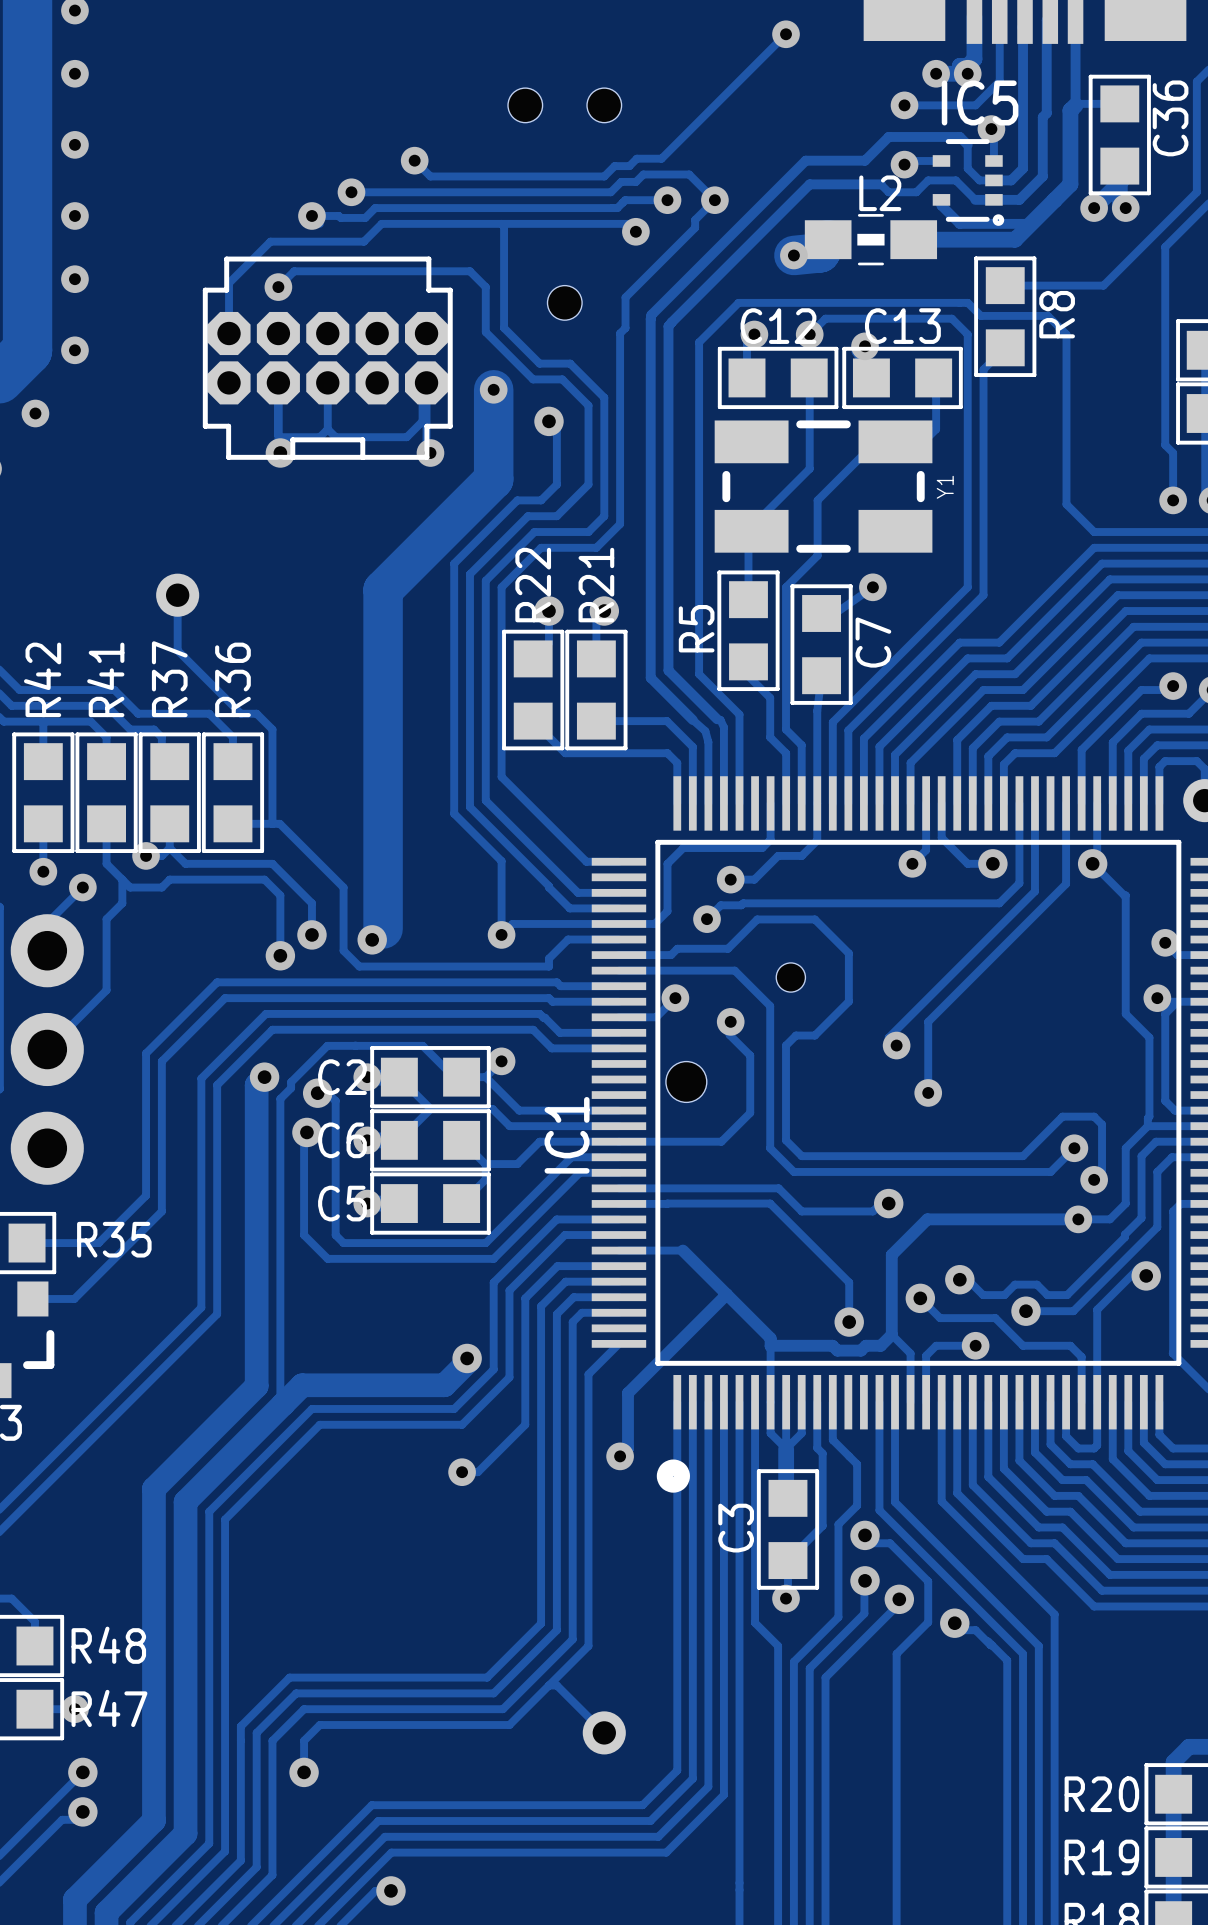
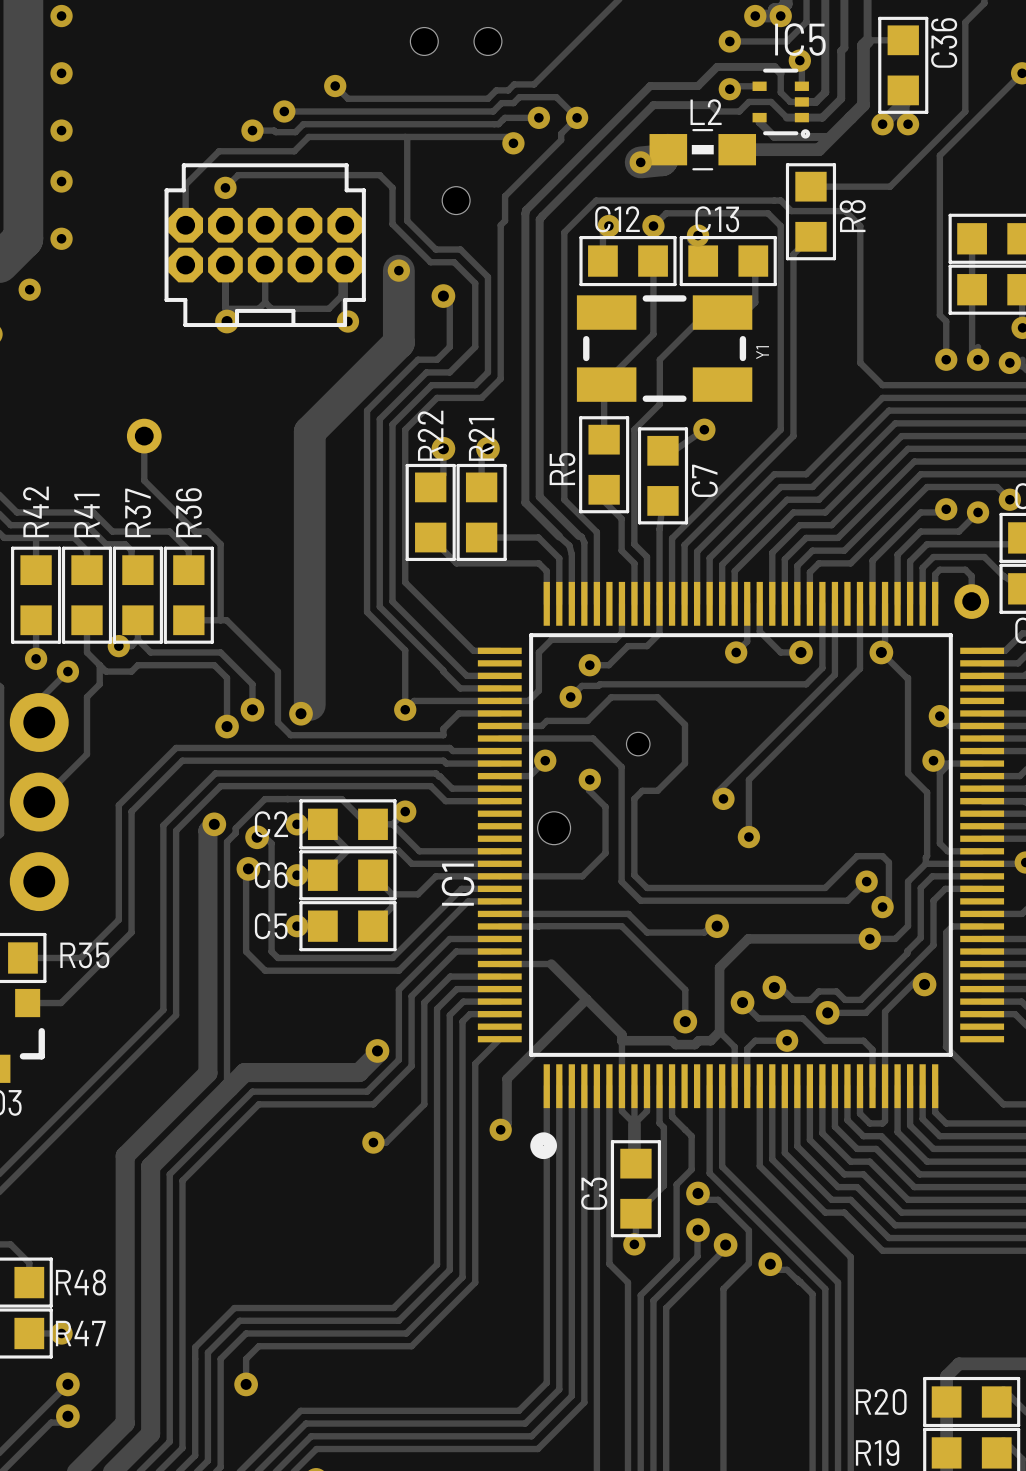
track: (548, 1685) (556, 1685) (604, 1732) -> none
part: (604, 1732) -> none

